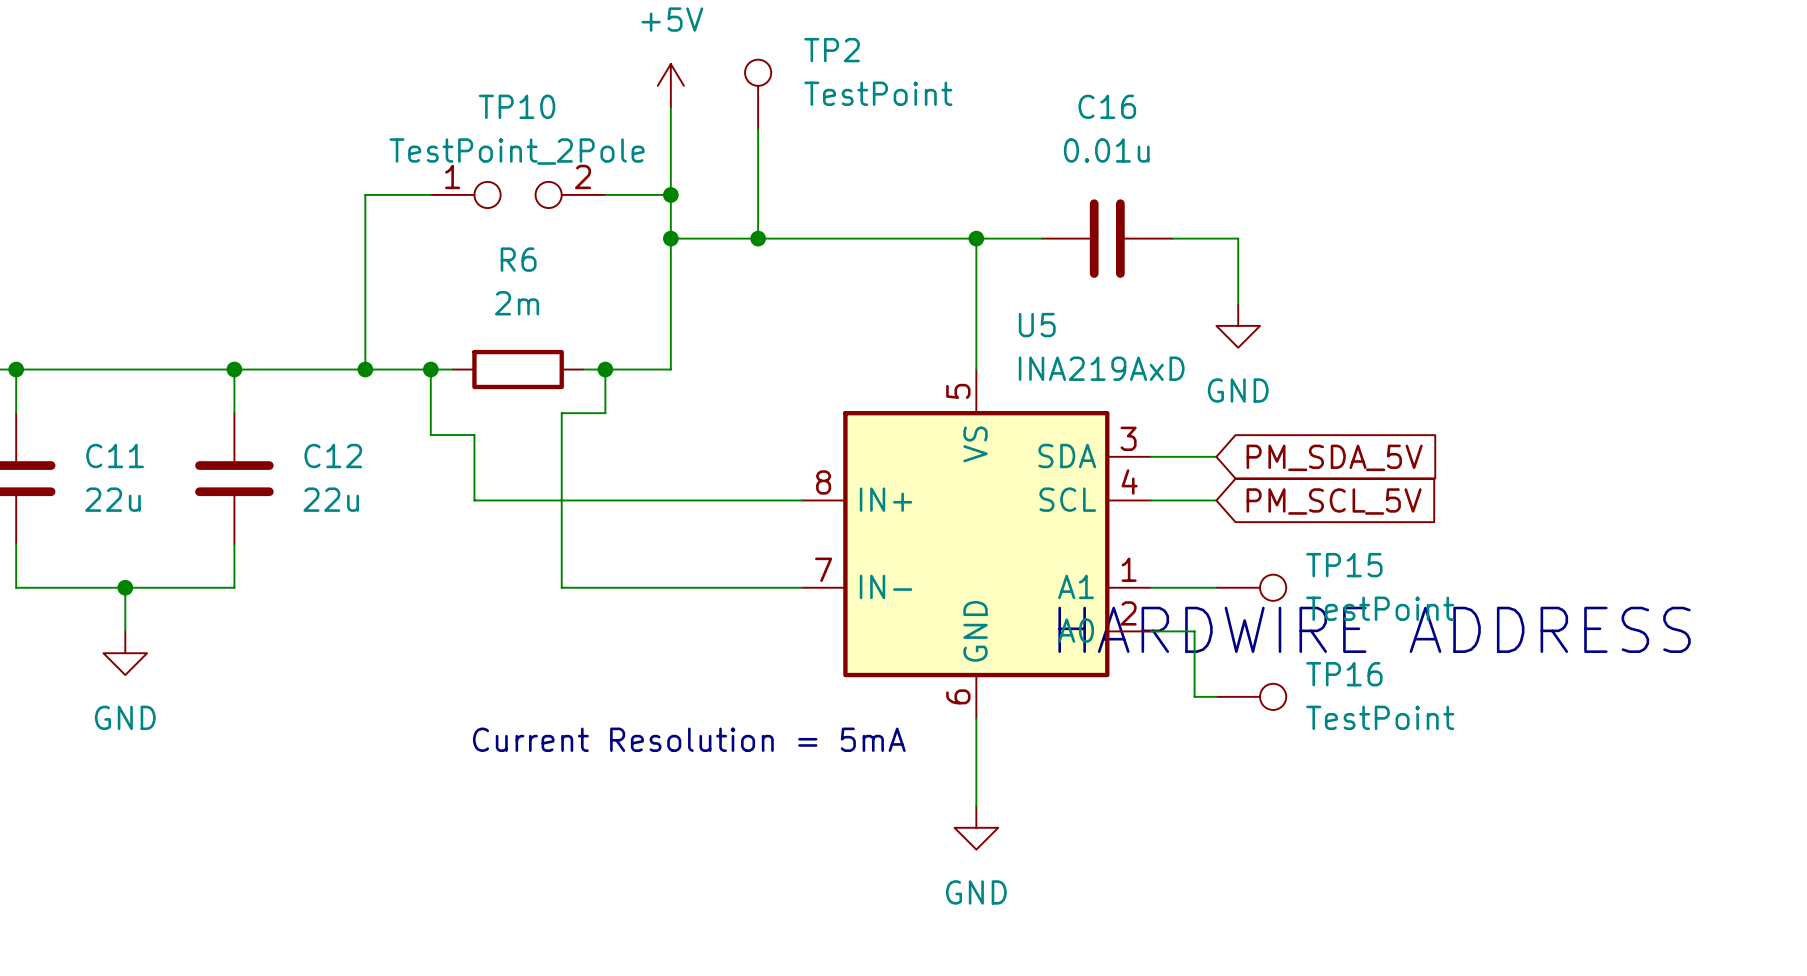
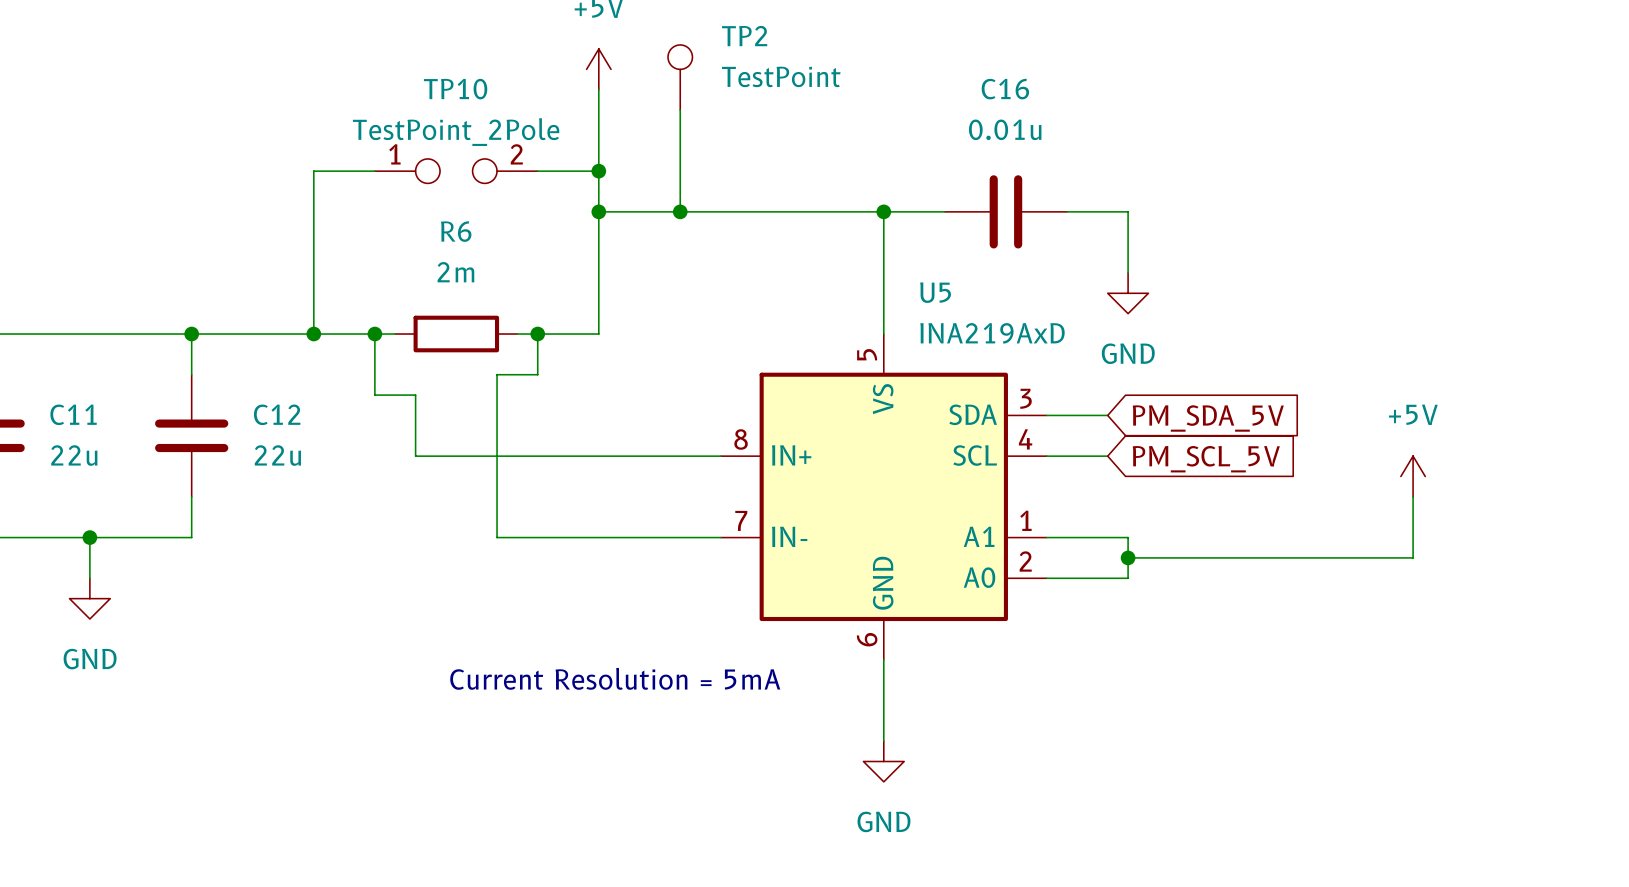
power symbol: none -> +5V (1413, 476)
wire: none -> (1413, 496) (1413, 557) (1128, 557)
TP15: TestPoint (1251, 587) -> none
junction: none -> (1128, 557)
text: HARDWIRE ADDRESS (1374, 629) -> none
wire: (1194, 631) (1194, 696) (1216, 696) -> (1087, 578) (1128, 578) (1128, 537) (1107, 537)
TP16: TestPoint (1251, 696) -> none

